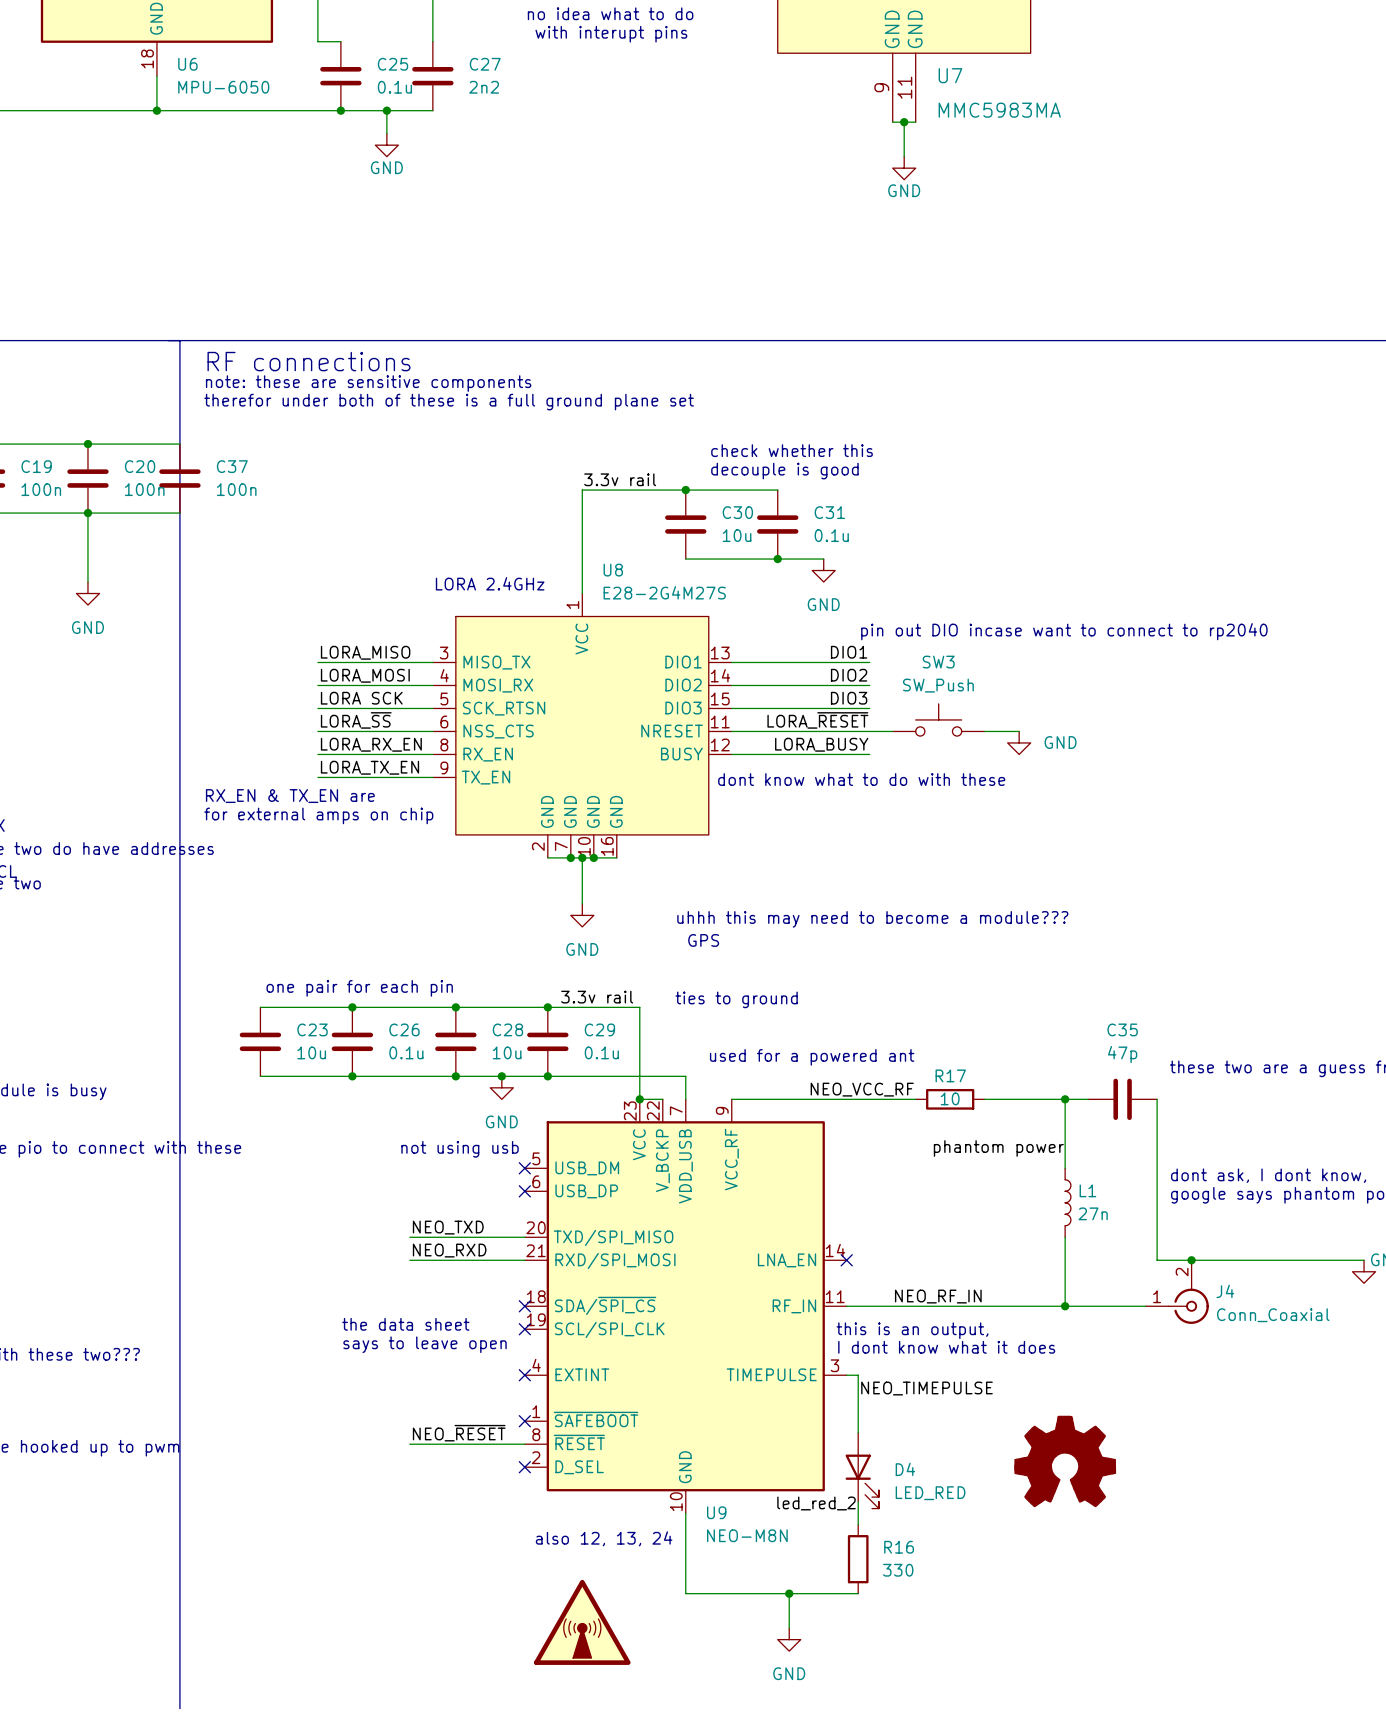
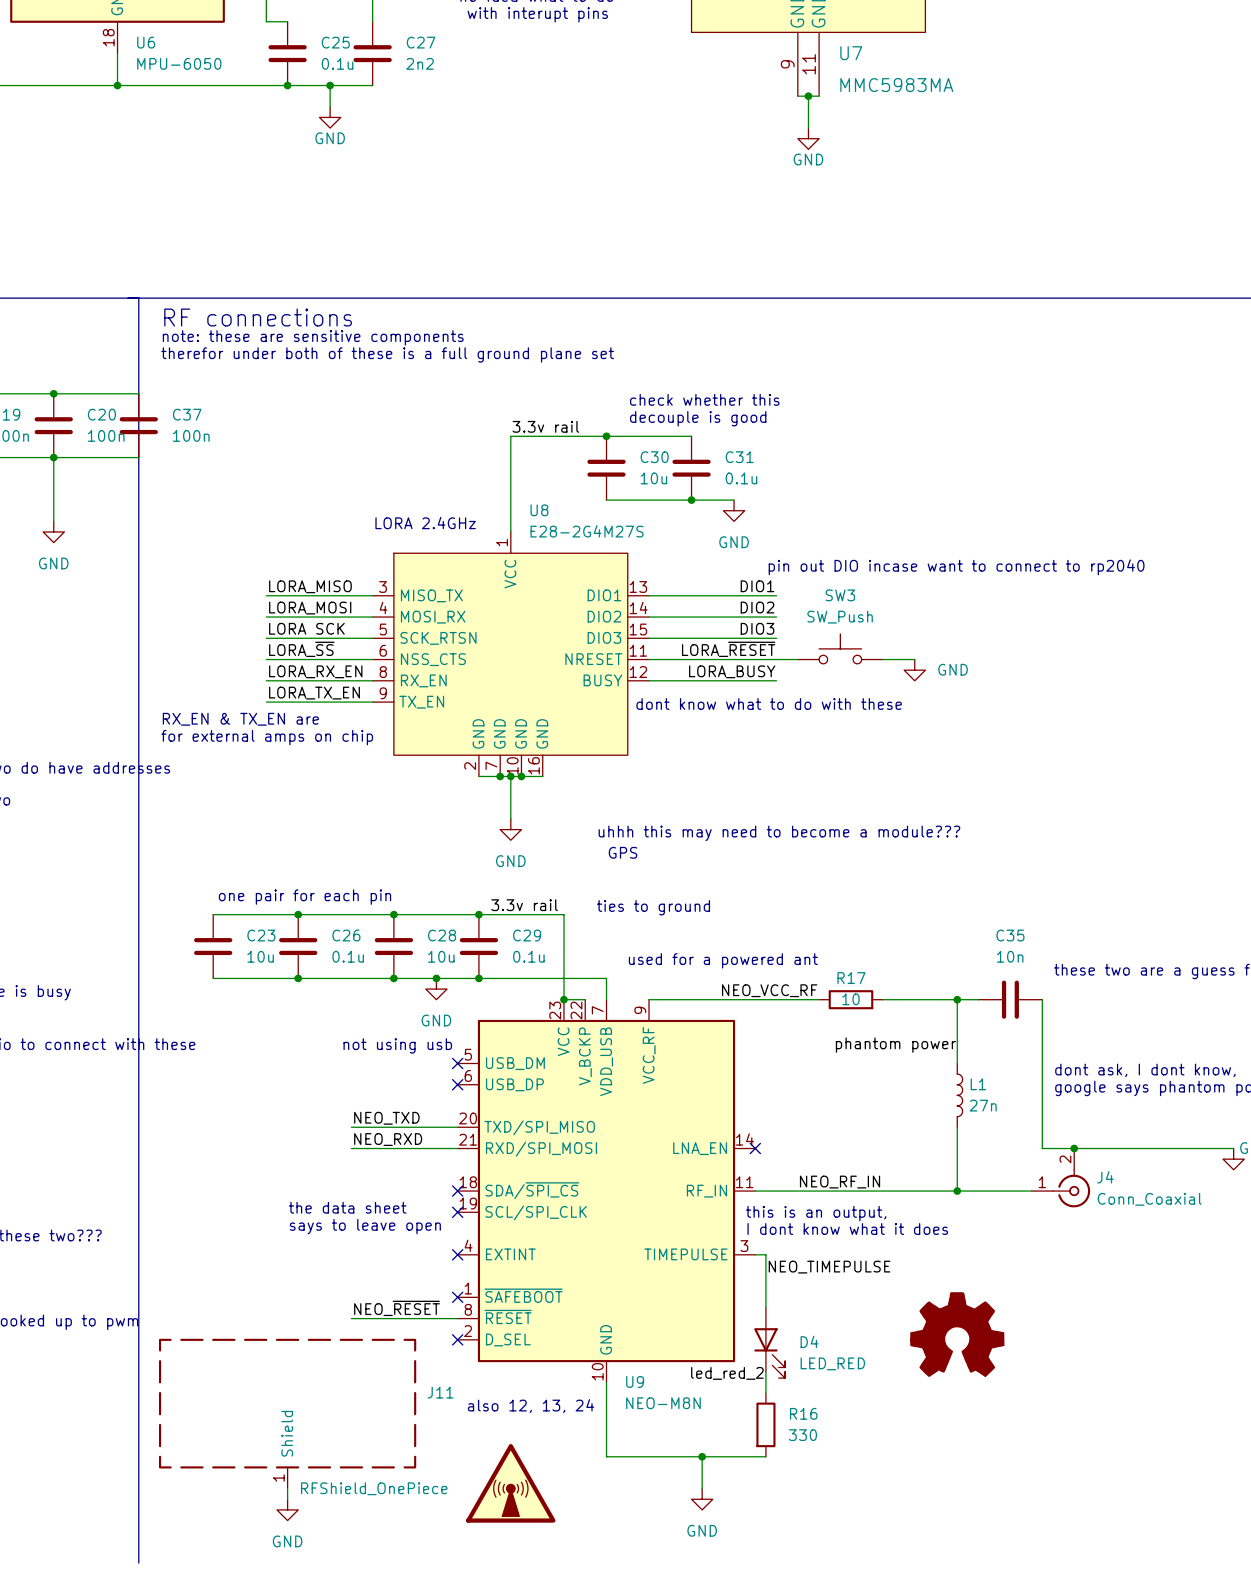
C35 value: 47p (1122, 1054) -> 10n (1010, 956)
J11: none -> RFShield_OnePiece (287, 1413)
wire: none -> (287, 1488) (287, 1499)
power symbol: none -> GND (287, 1509)

